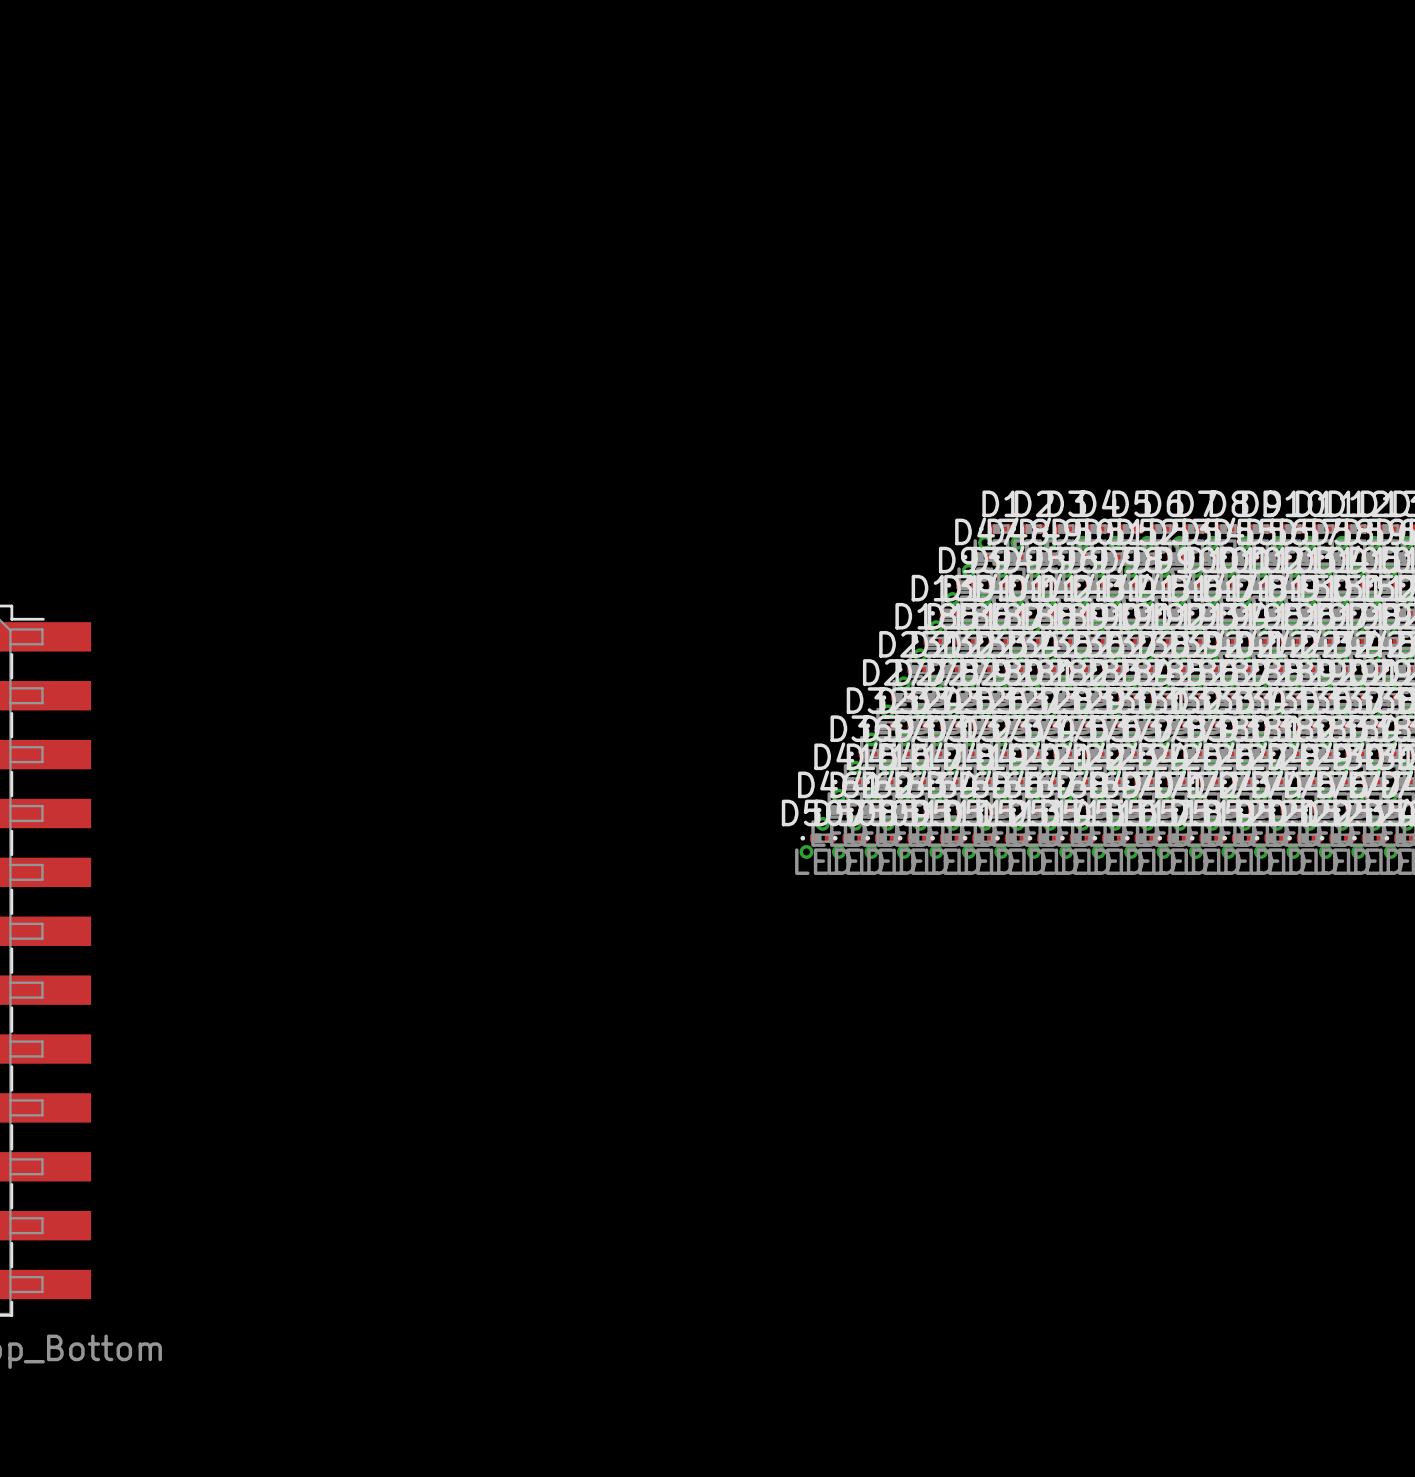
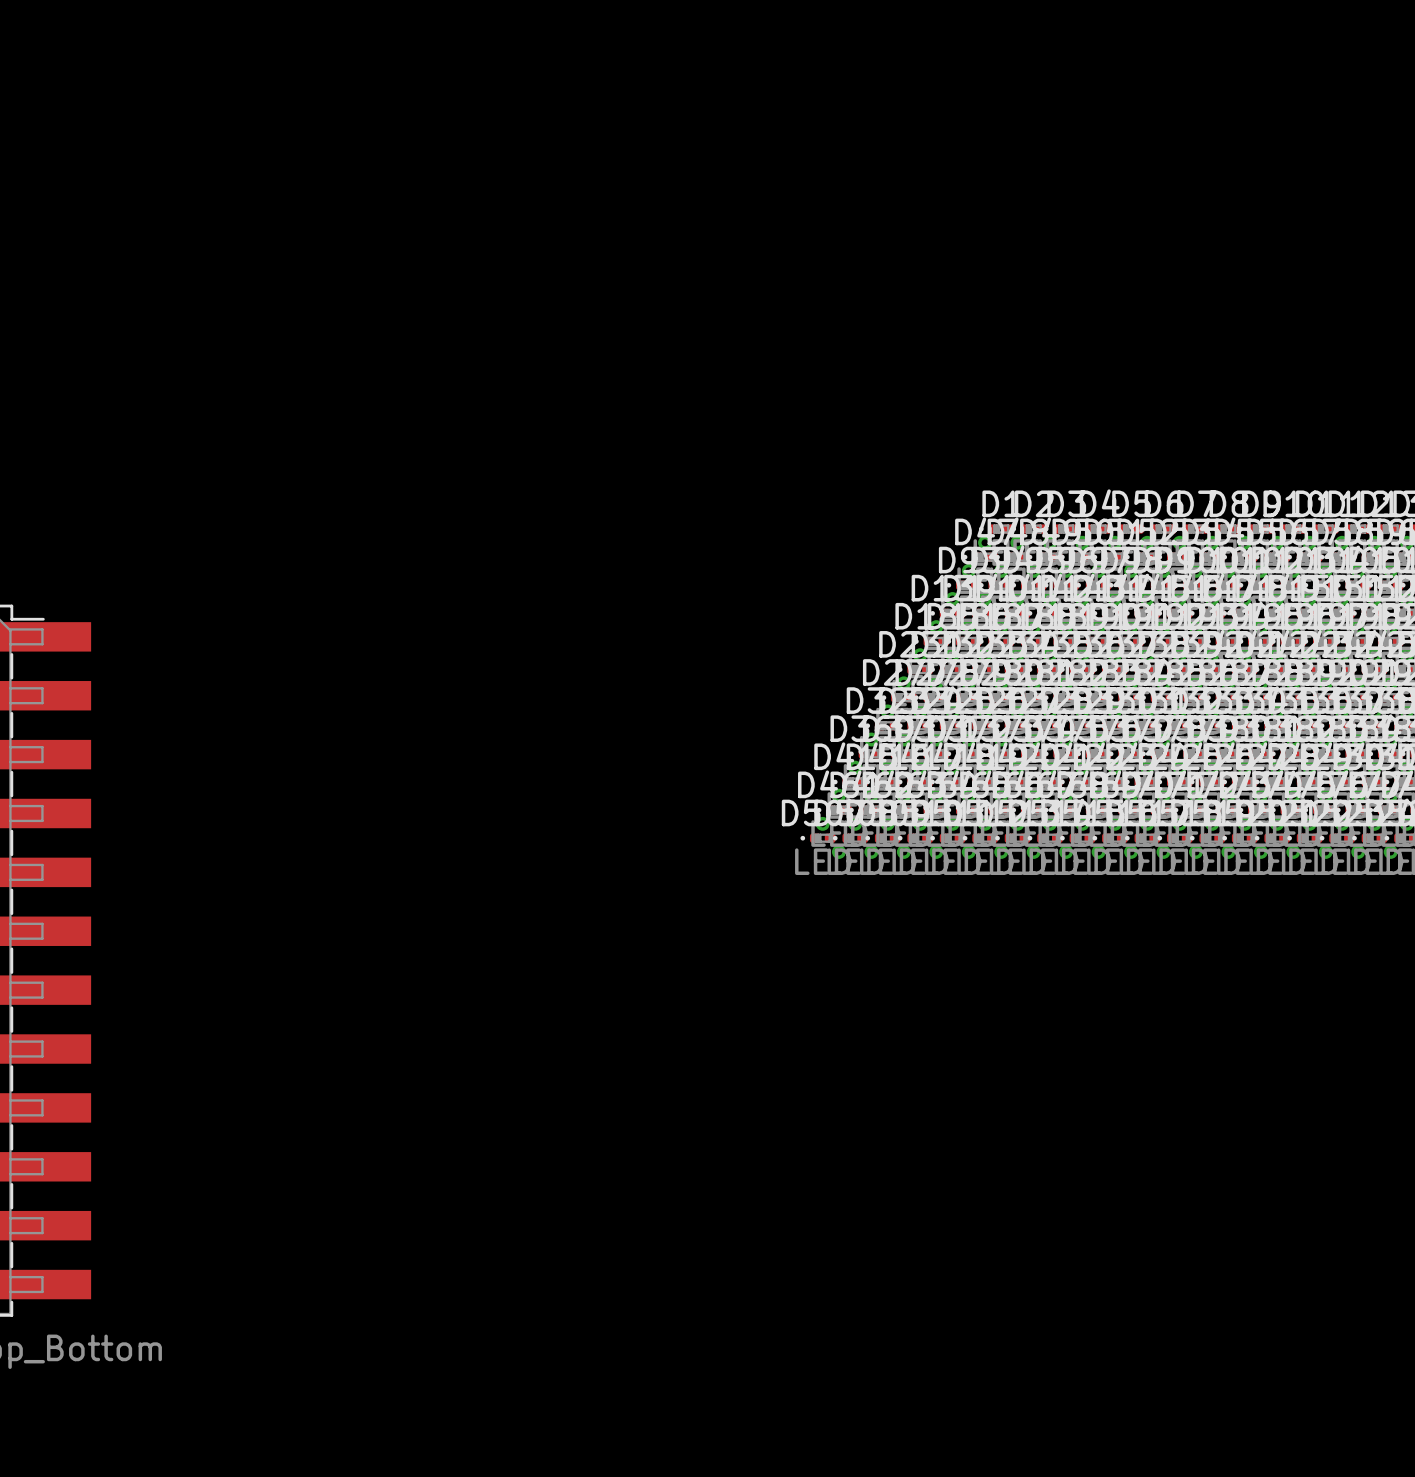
via: (806, 851) -> none

